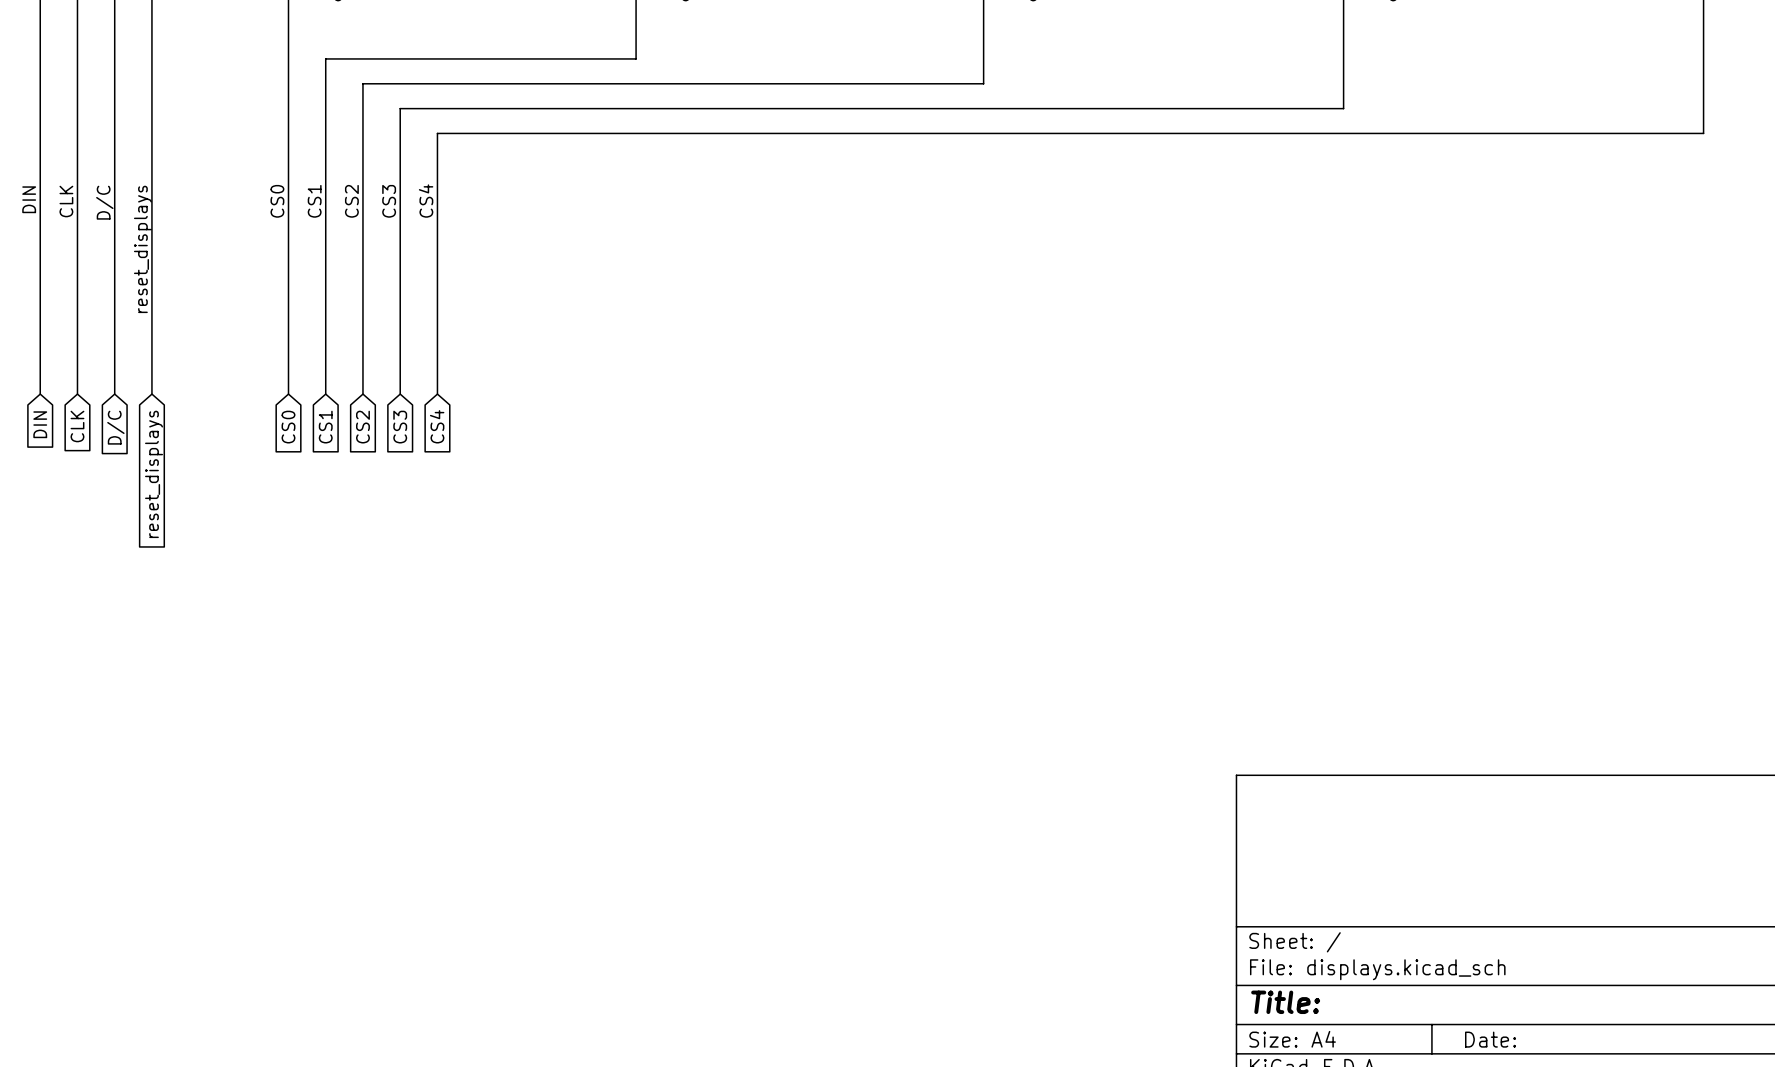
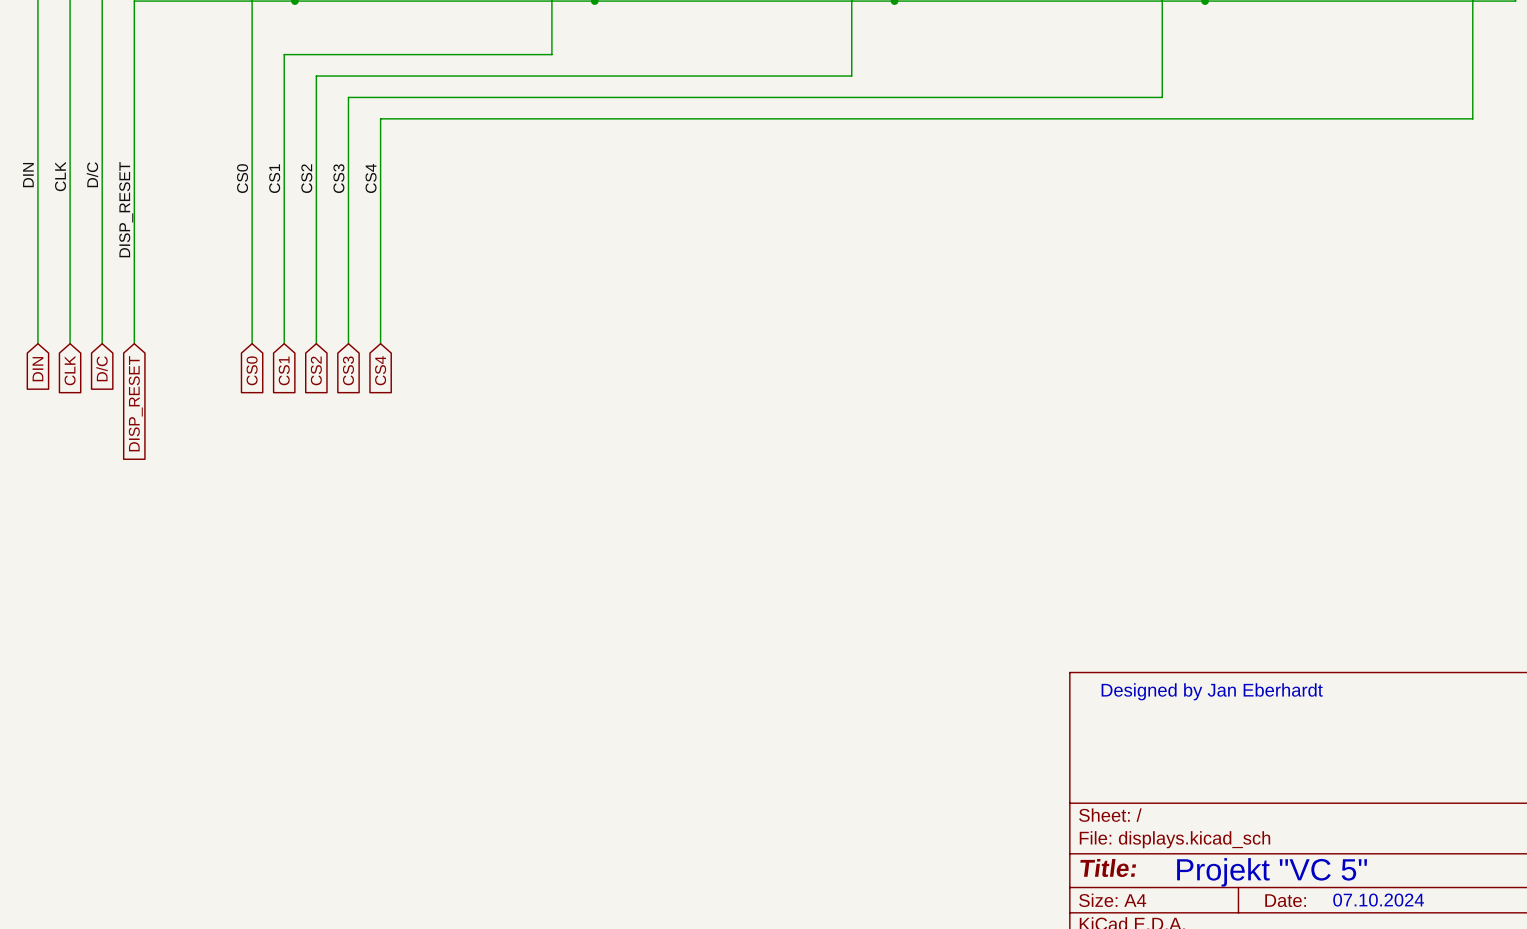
label: reset_displays (142, 249) -> DISP_RESET (126, 209)
global label: reset_displays (154, 474) -> DISP_RESET (135, 403)
text: none -> Designed by Jan Eberhardt (1212, 691)
text: none -> Projekt "VC 5" (1272, 872)
text: none -> 07.10.2024 (1378, 900)

